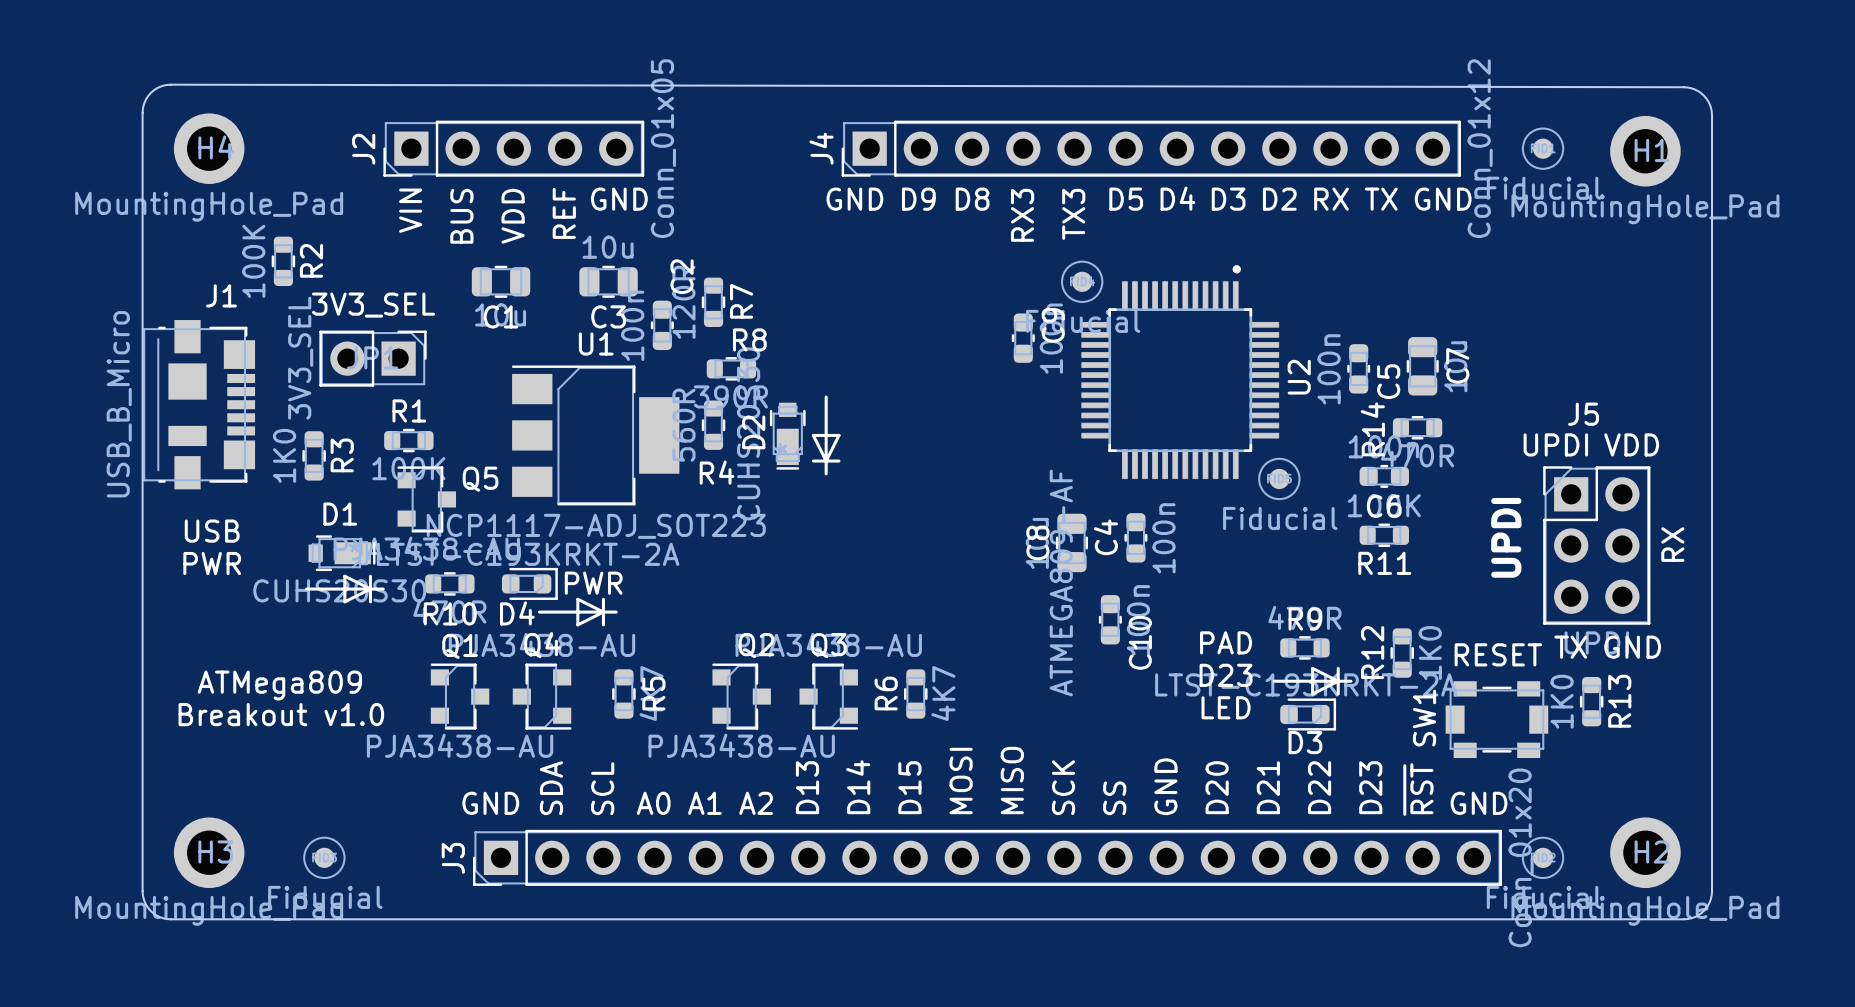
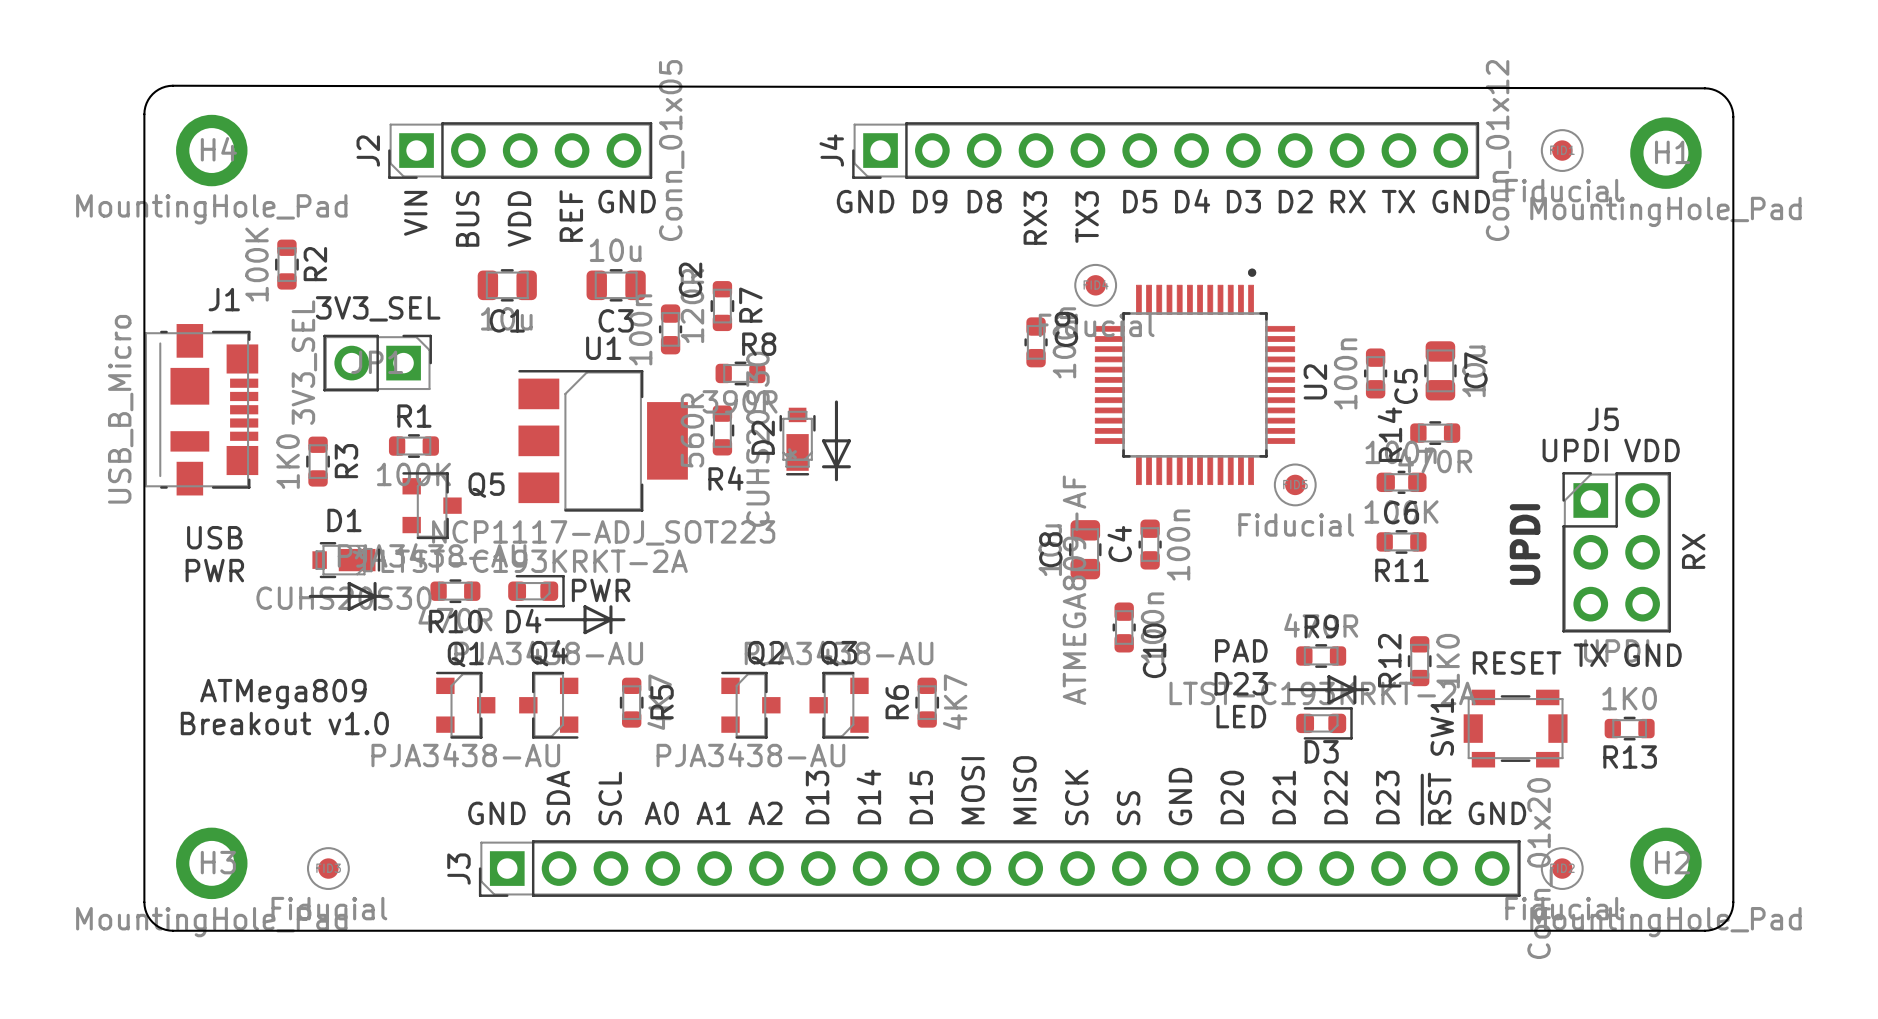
R13 rotation: 0° (1591, 701) -> 90° clockwise (1629, 728)

